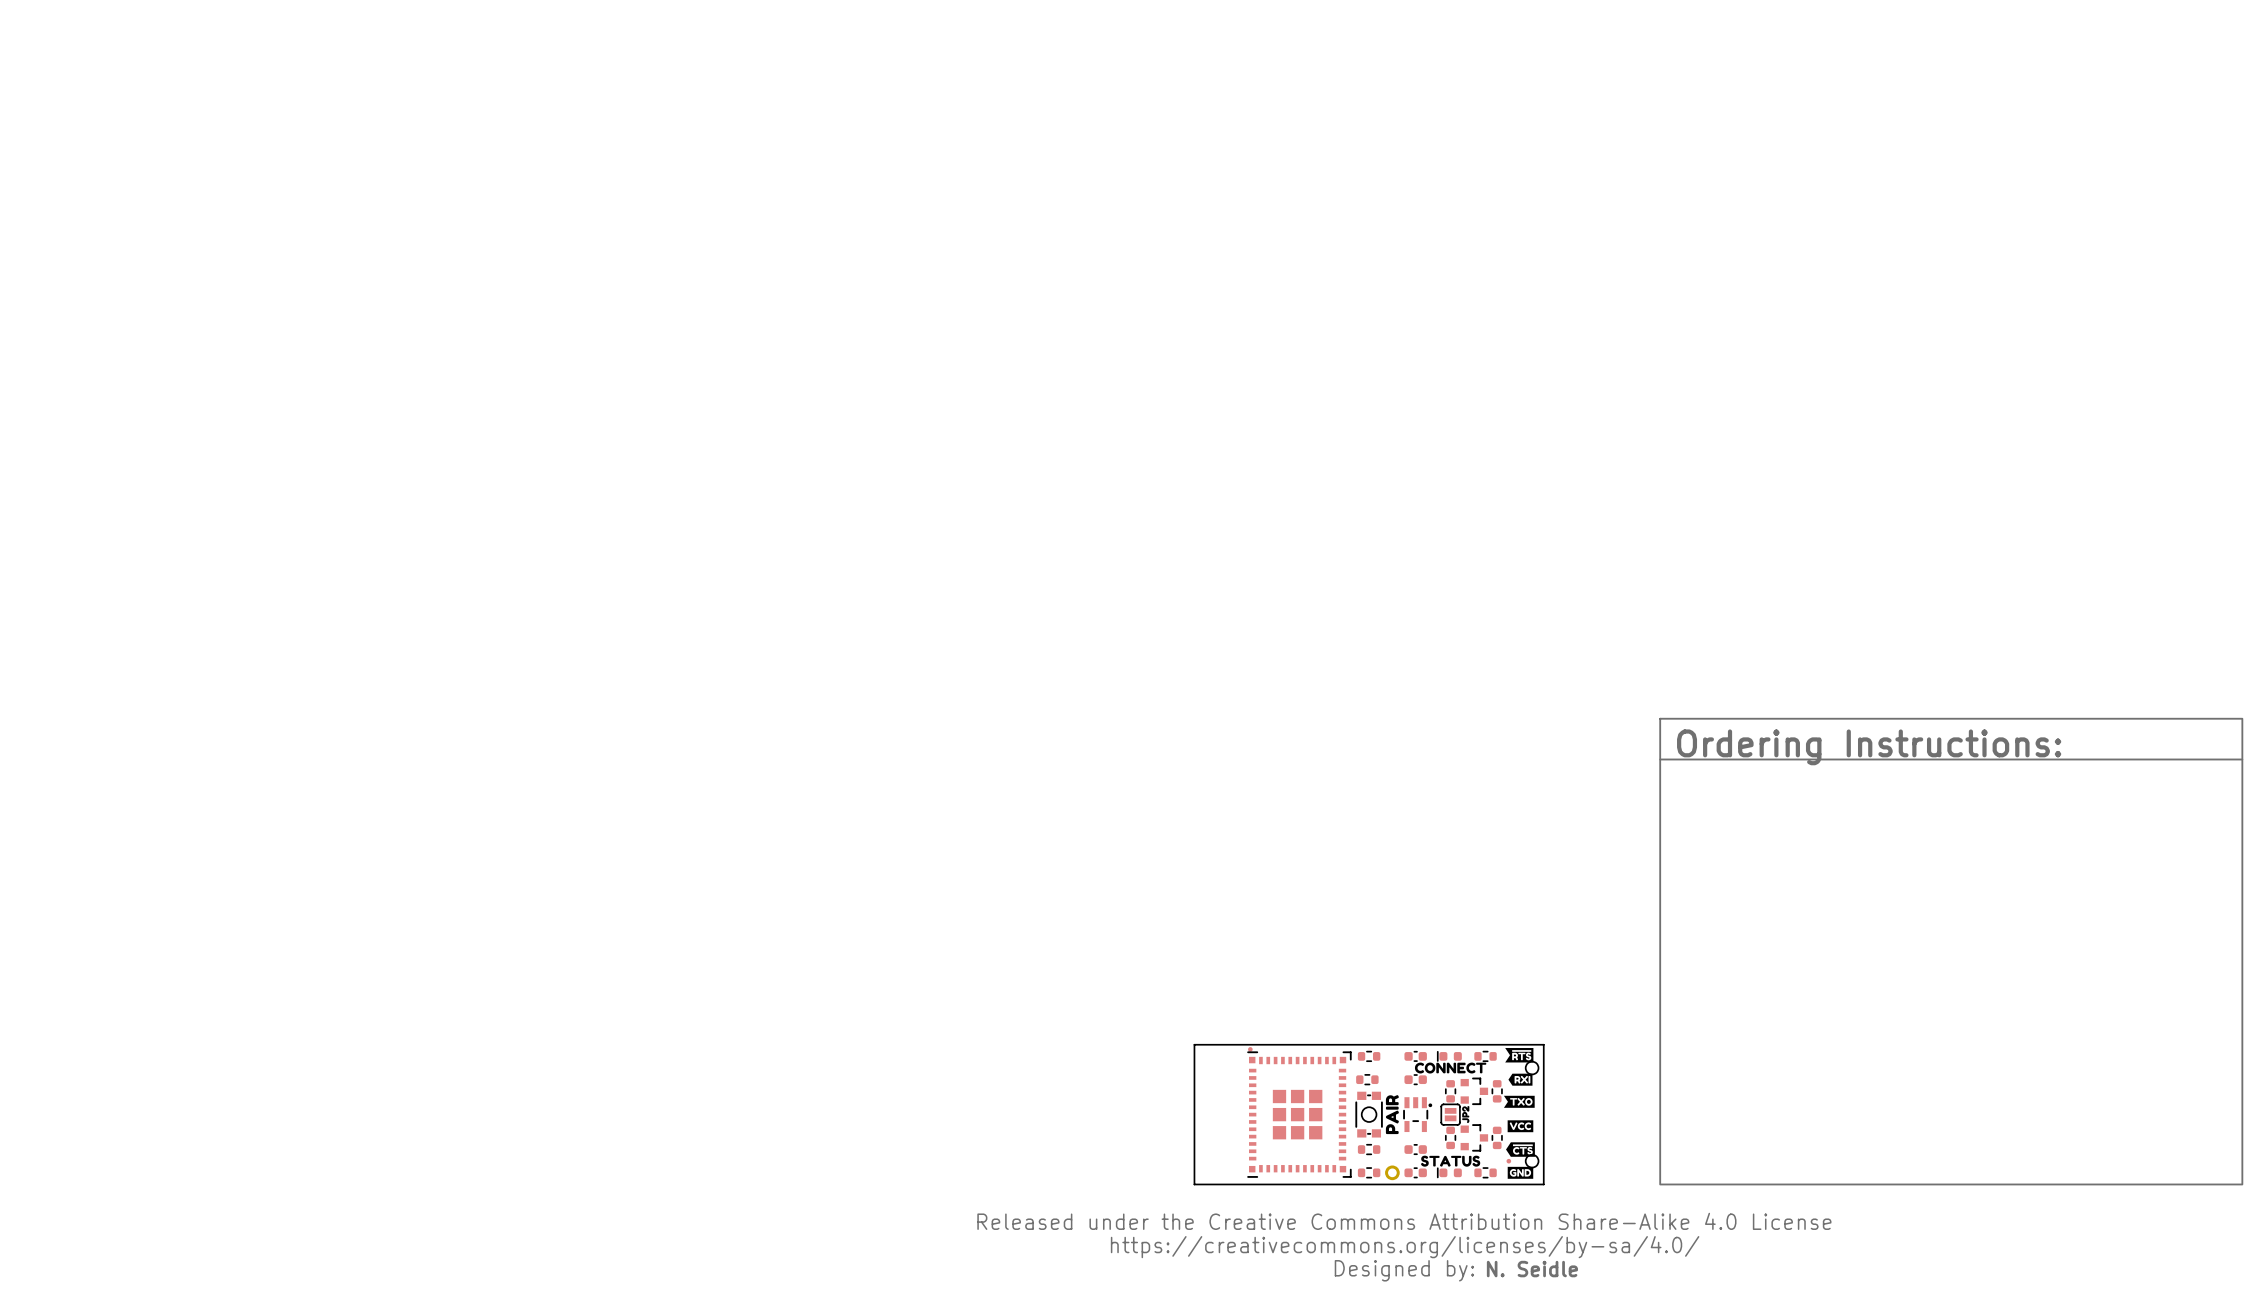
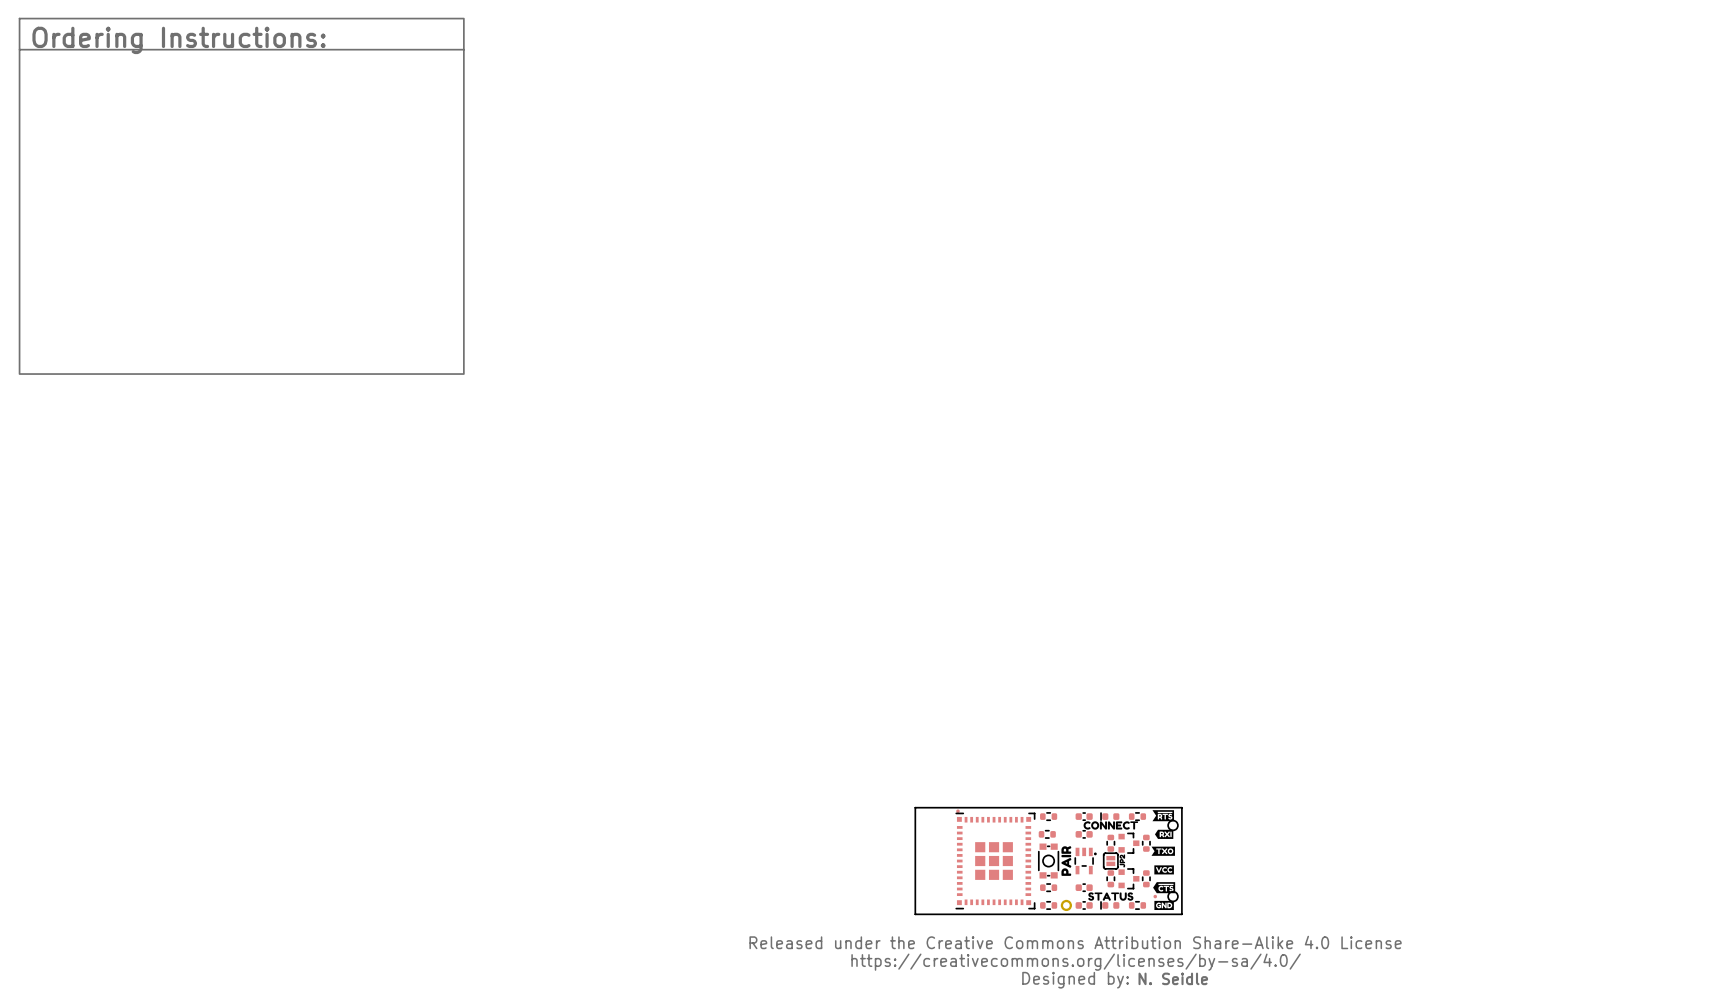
drawing: none -> [18, 17, 465, 375]
drawing: [1659, 717, 2244, 1186] -> none

